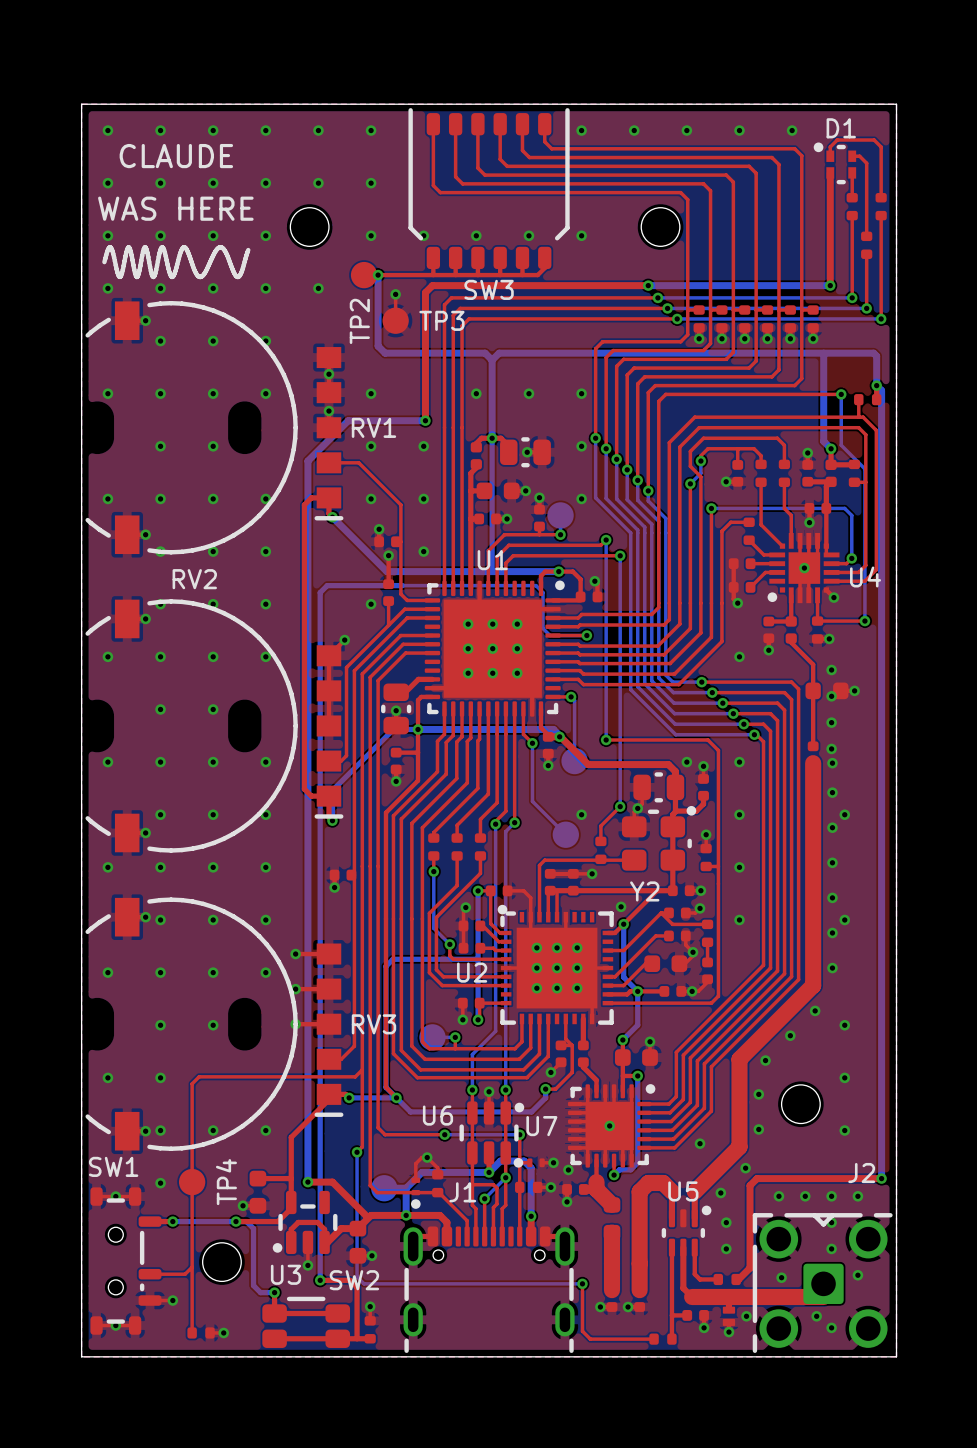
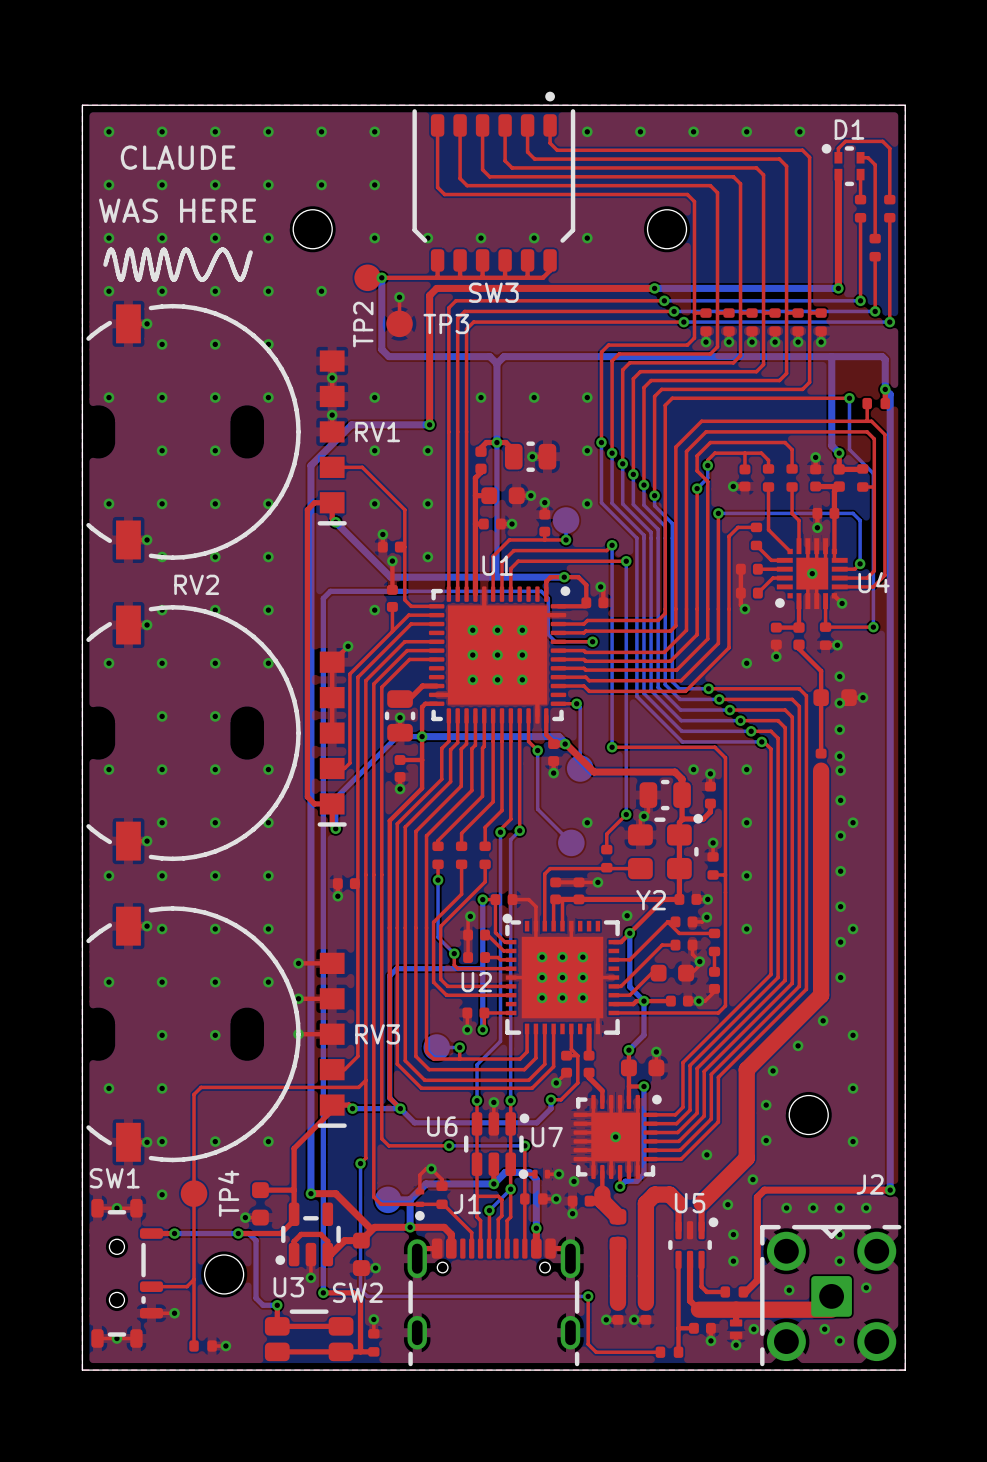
SW3 footprint: [408, 108, 570, 270] -> [412, 91, 576, 272]

